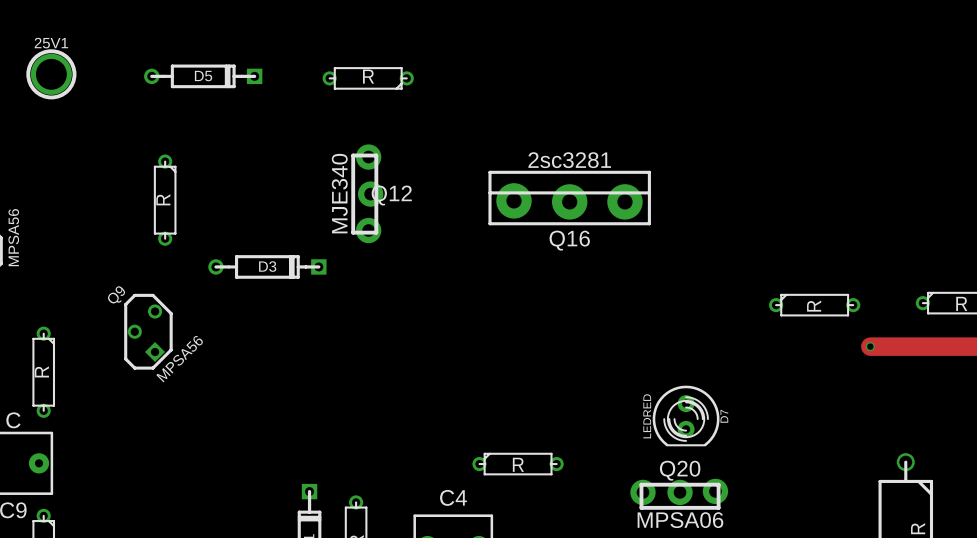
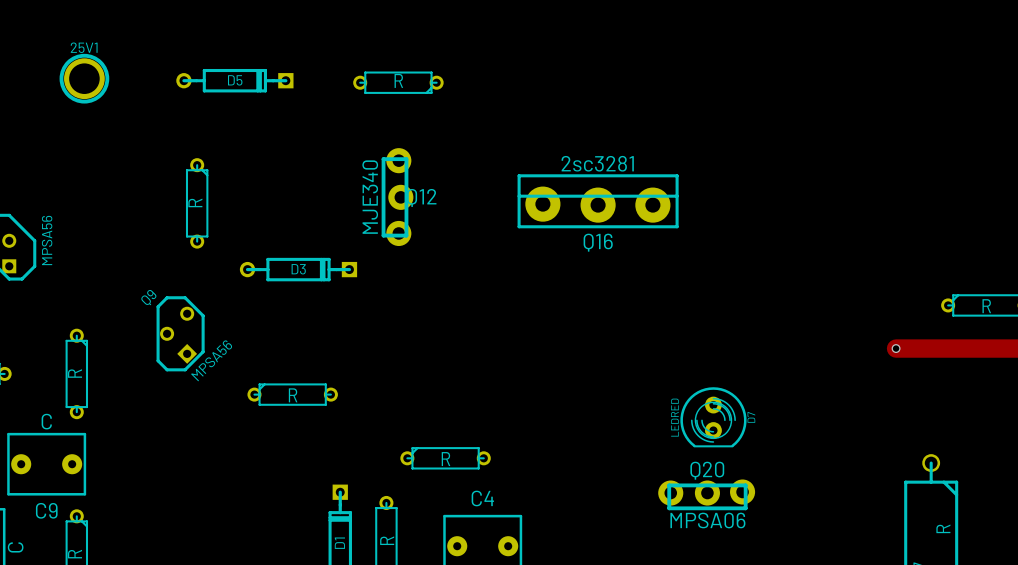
part: R (814, 305) -> none
part: none -> R (292, 394)
part: none -> R (445, 458)
part: R (518, 464) -> none

